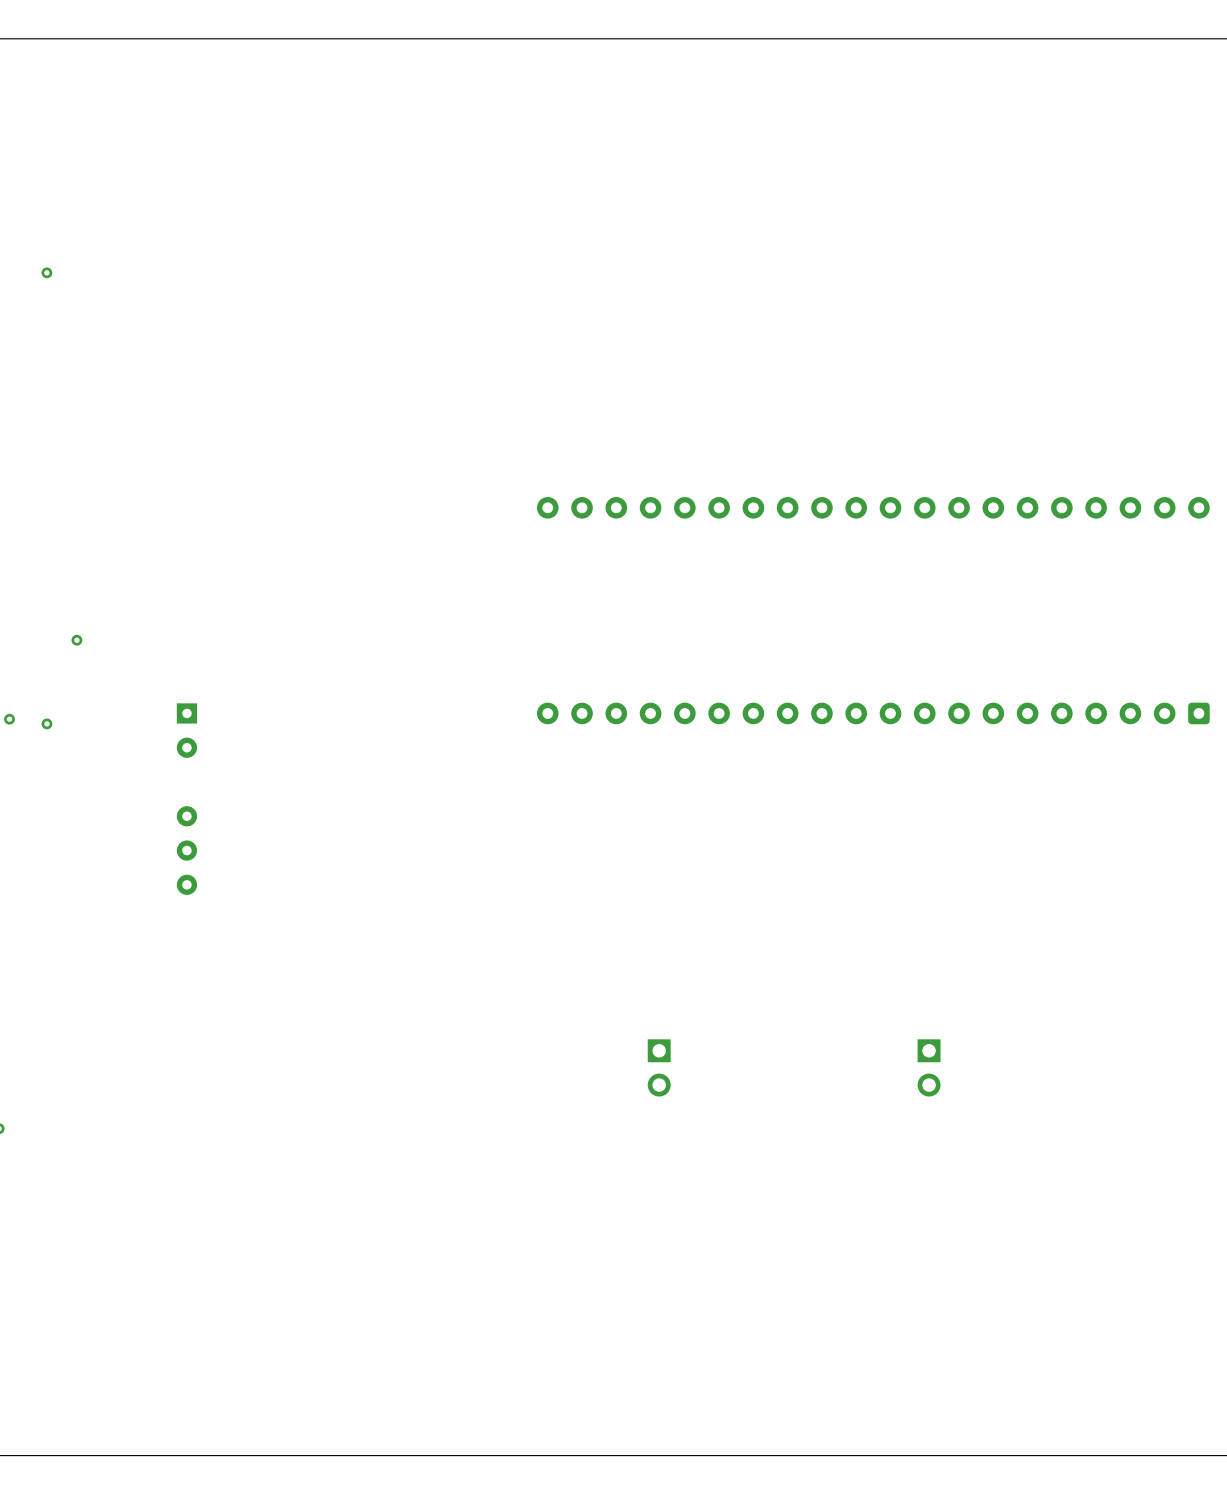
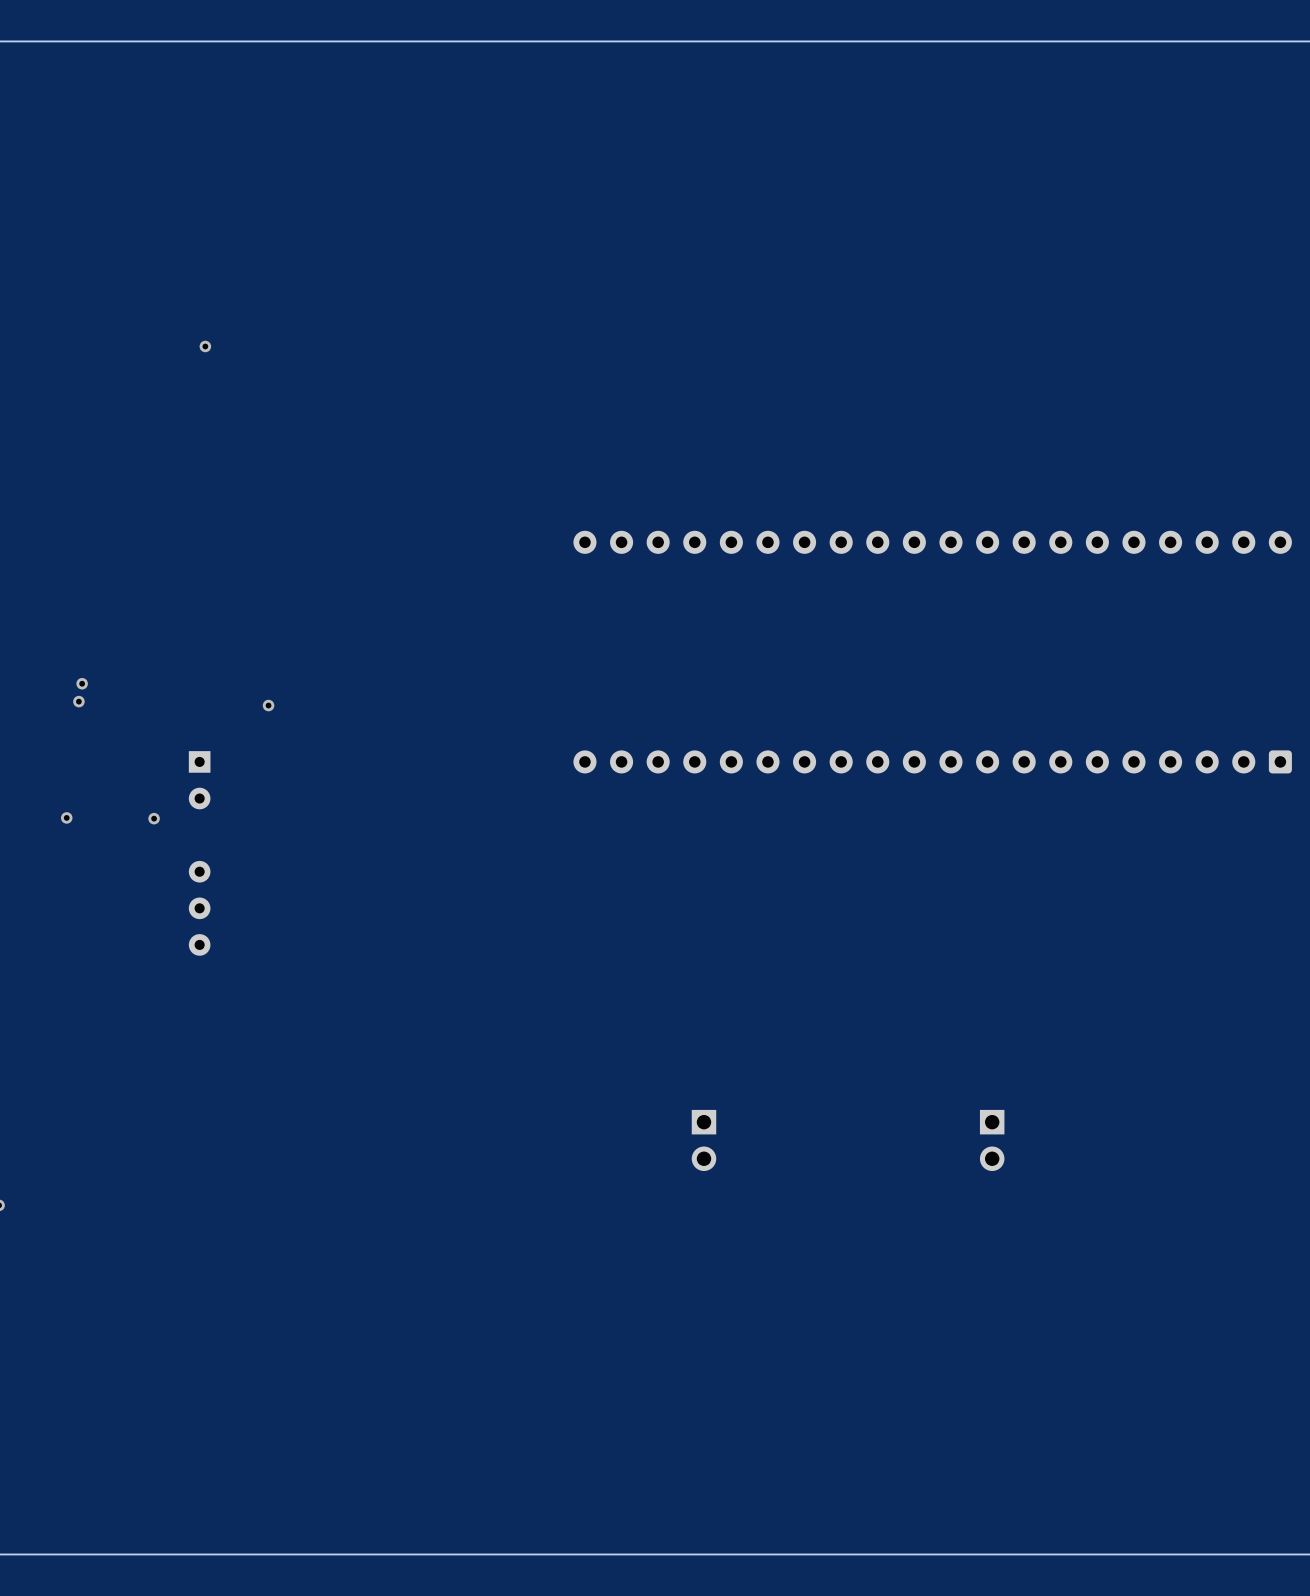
via: (46, 272) -> none
via: none -> (205, 346)
via: none -> (78, 701)
via: none -> (268, 705)
via: (9, 719) -> none
via: (46, 723) -> none
via: none -> (66, 817)
via: none -> (154, 818)

